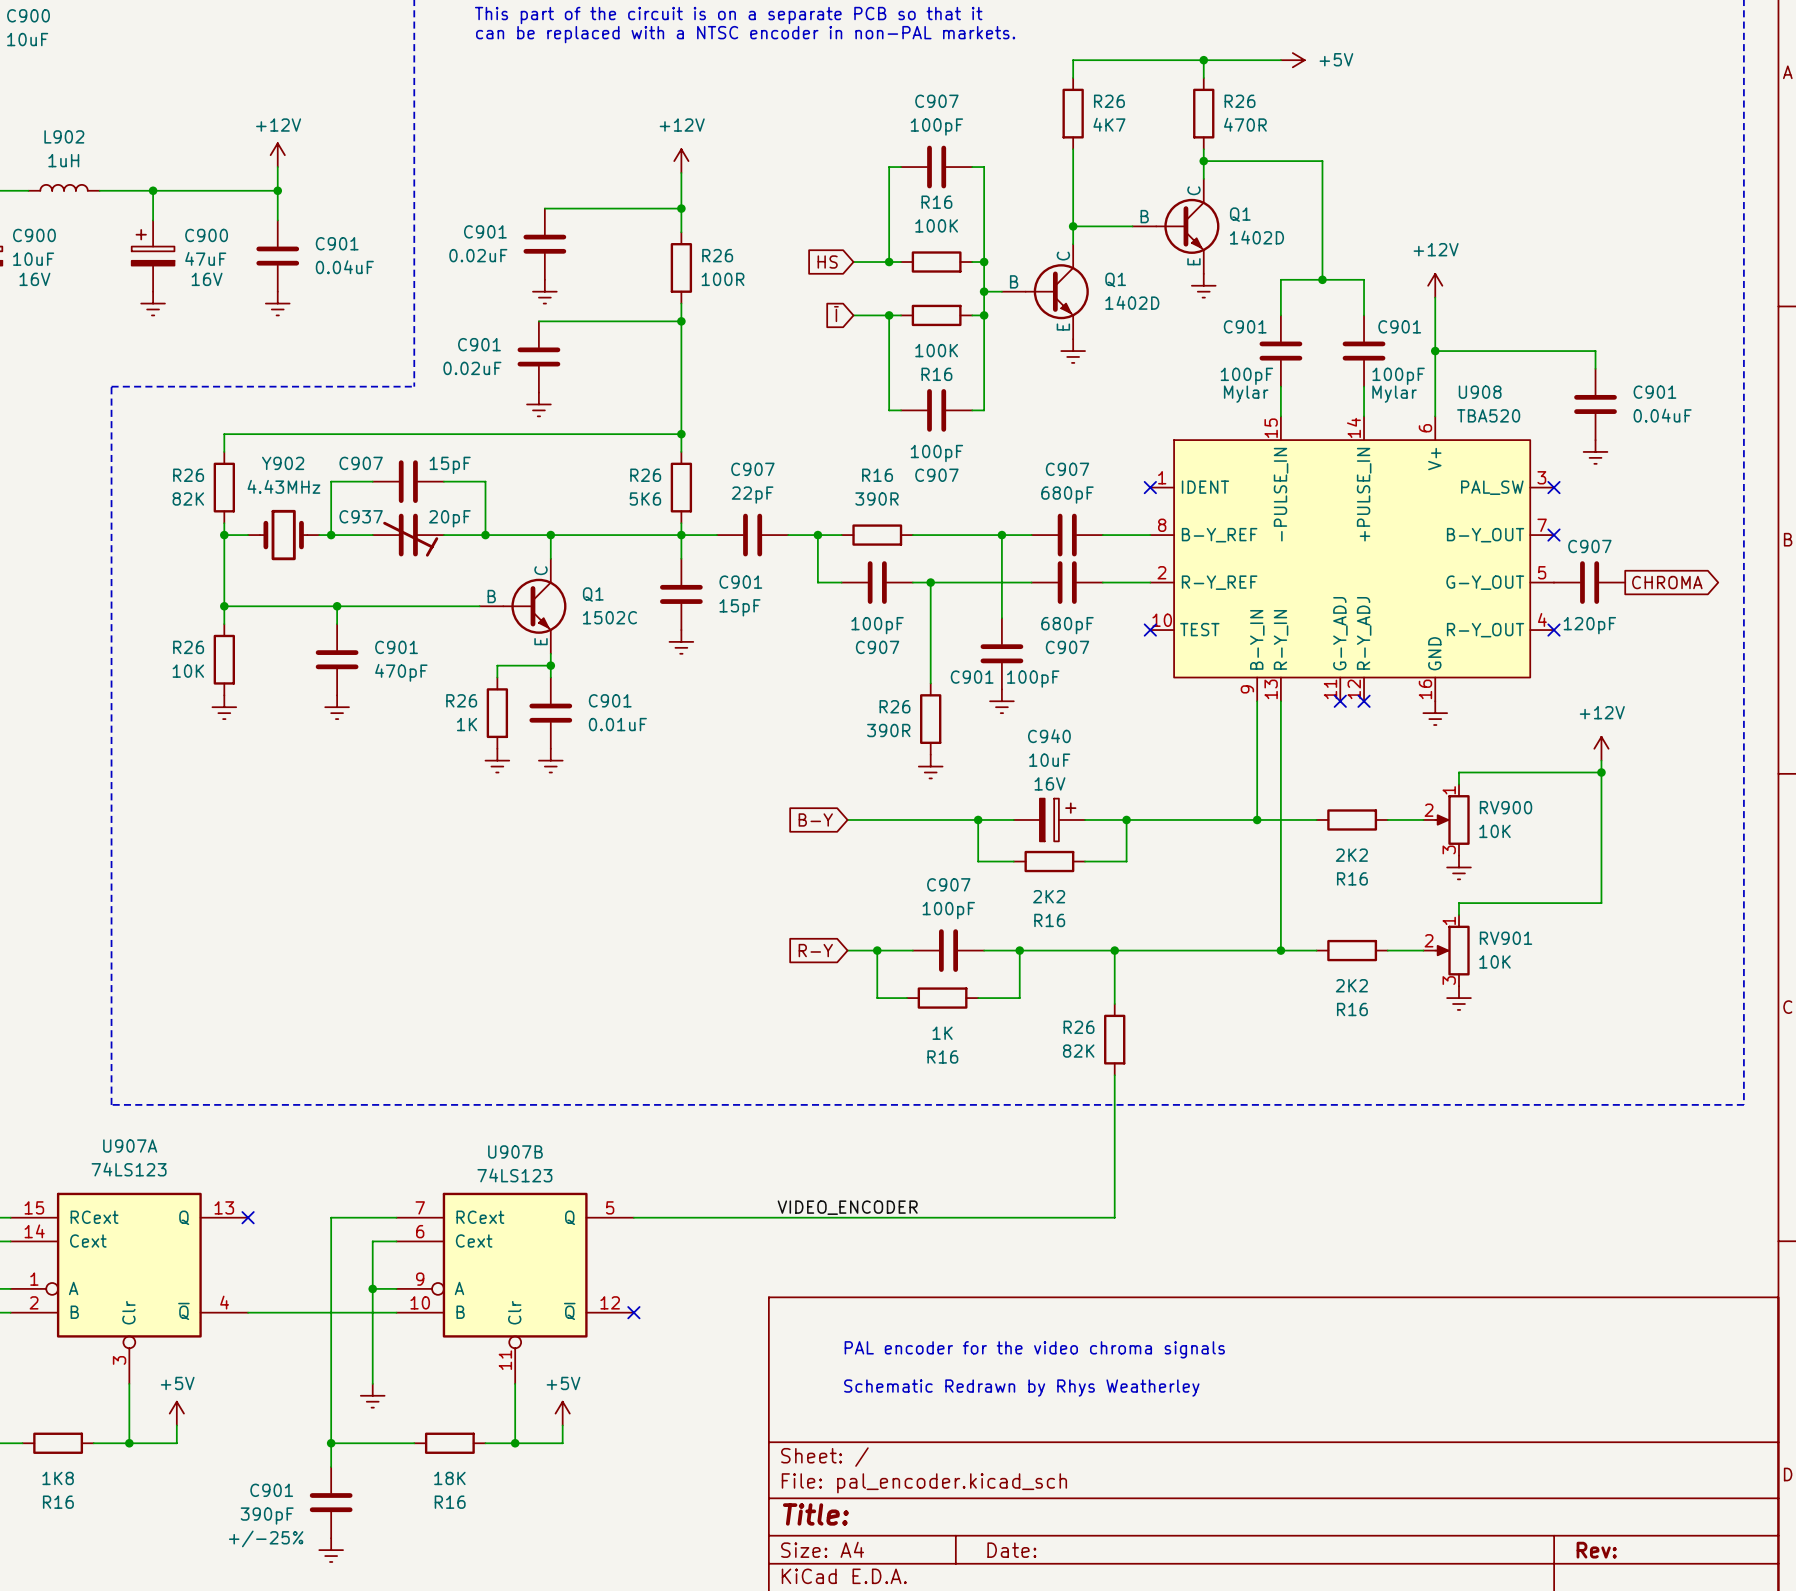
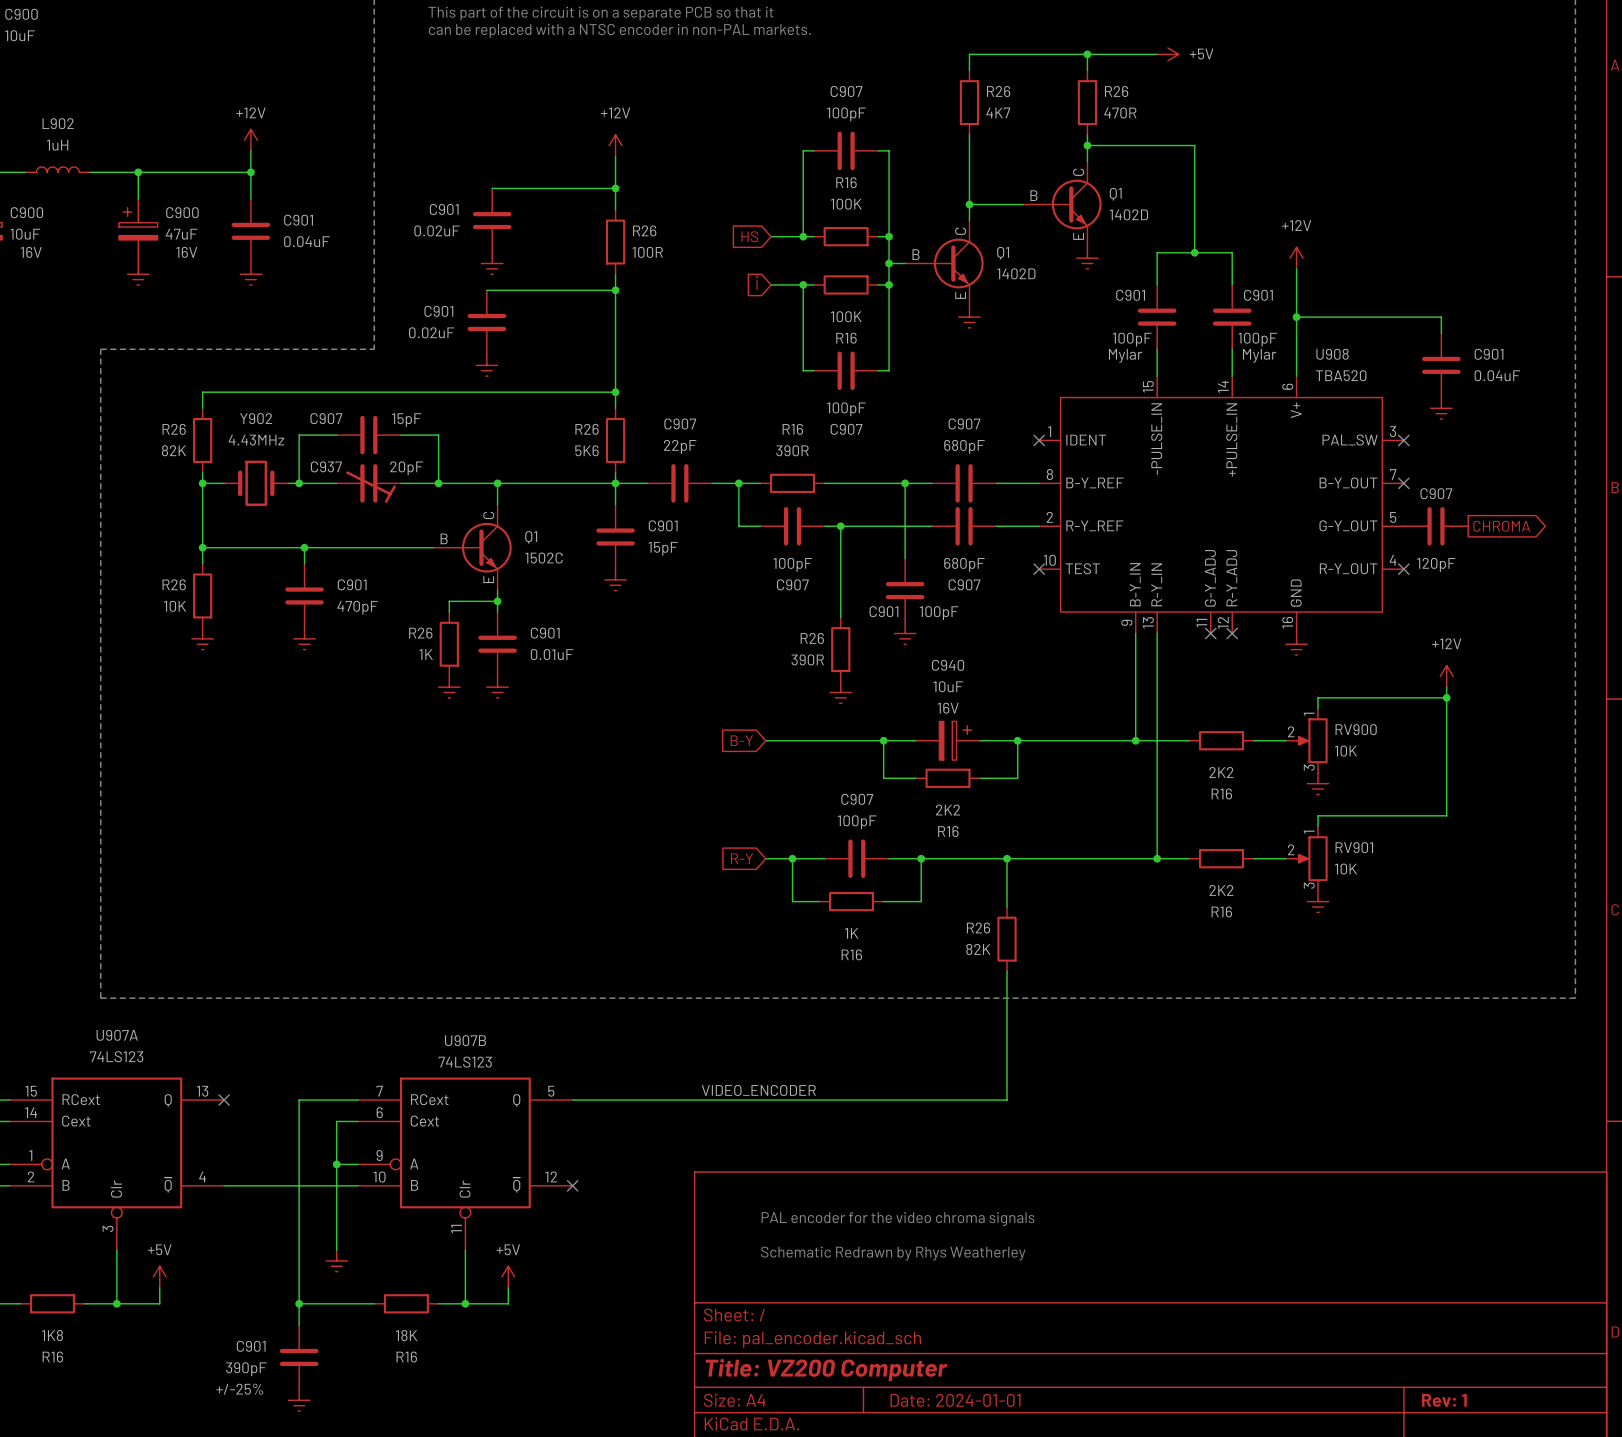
title block: Title: (815, 1514) -> Title: VZ200 Computer (826, 1369)
title block: Date: (1011, 1550) -> Date: 2024-01-01 (955, 1400)
title block: Rev: (1596, 1550) -> Rev: 1 (1444, 1400)

